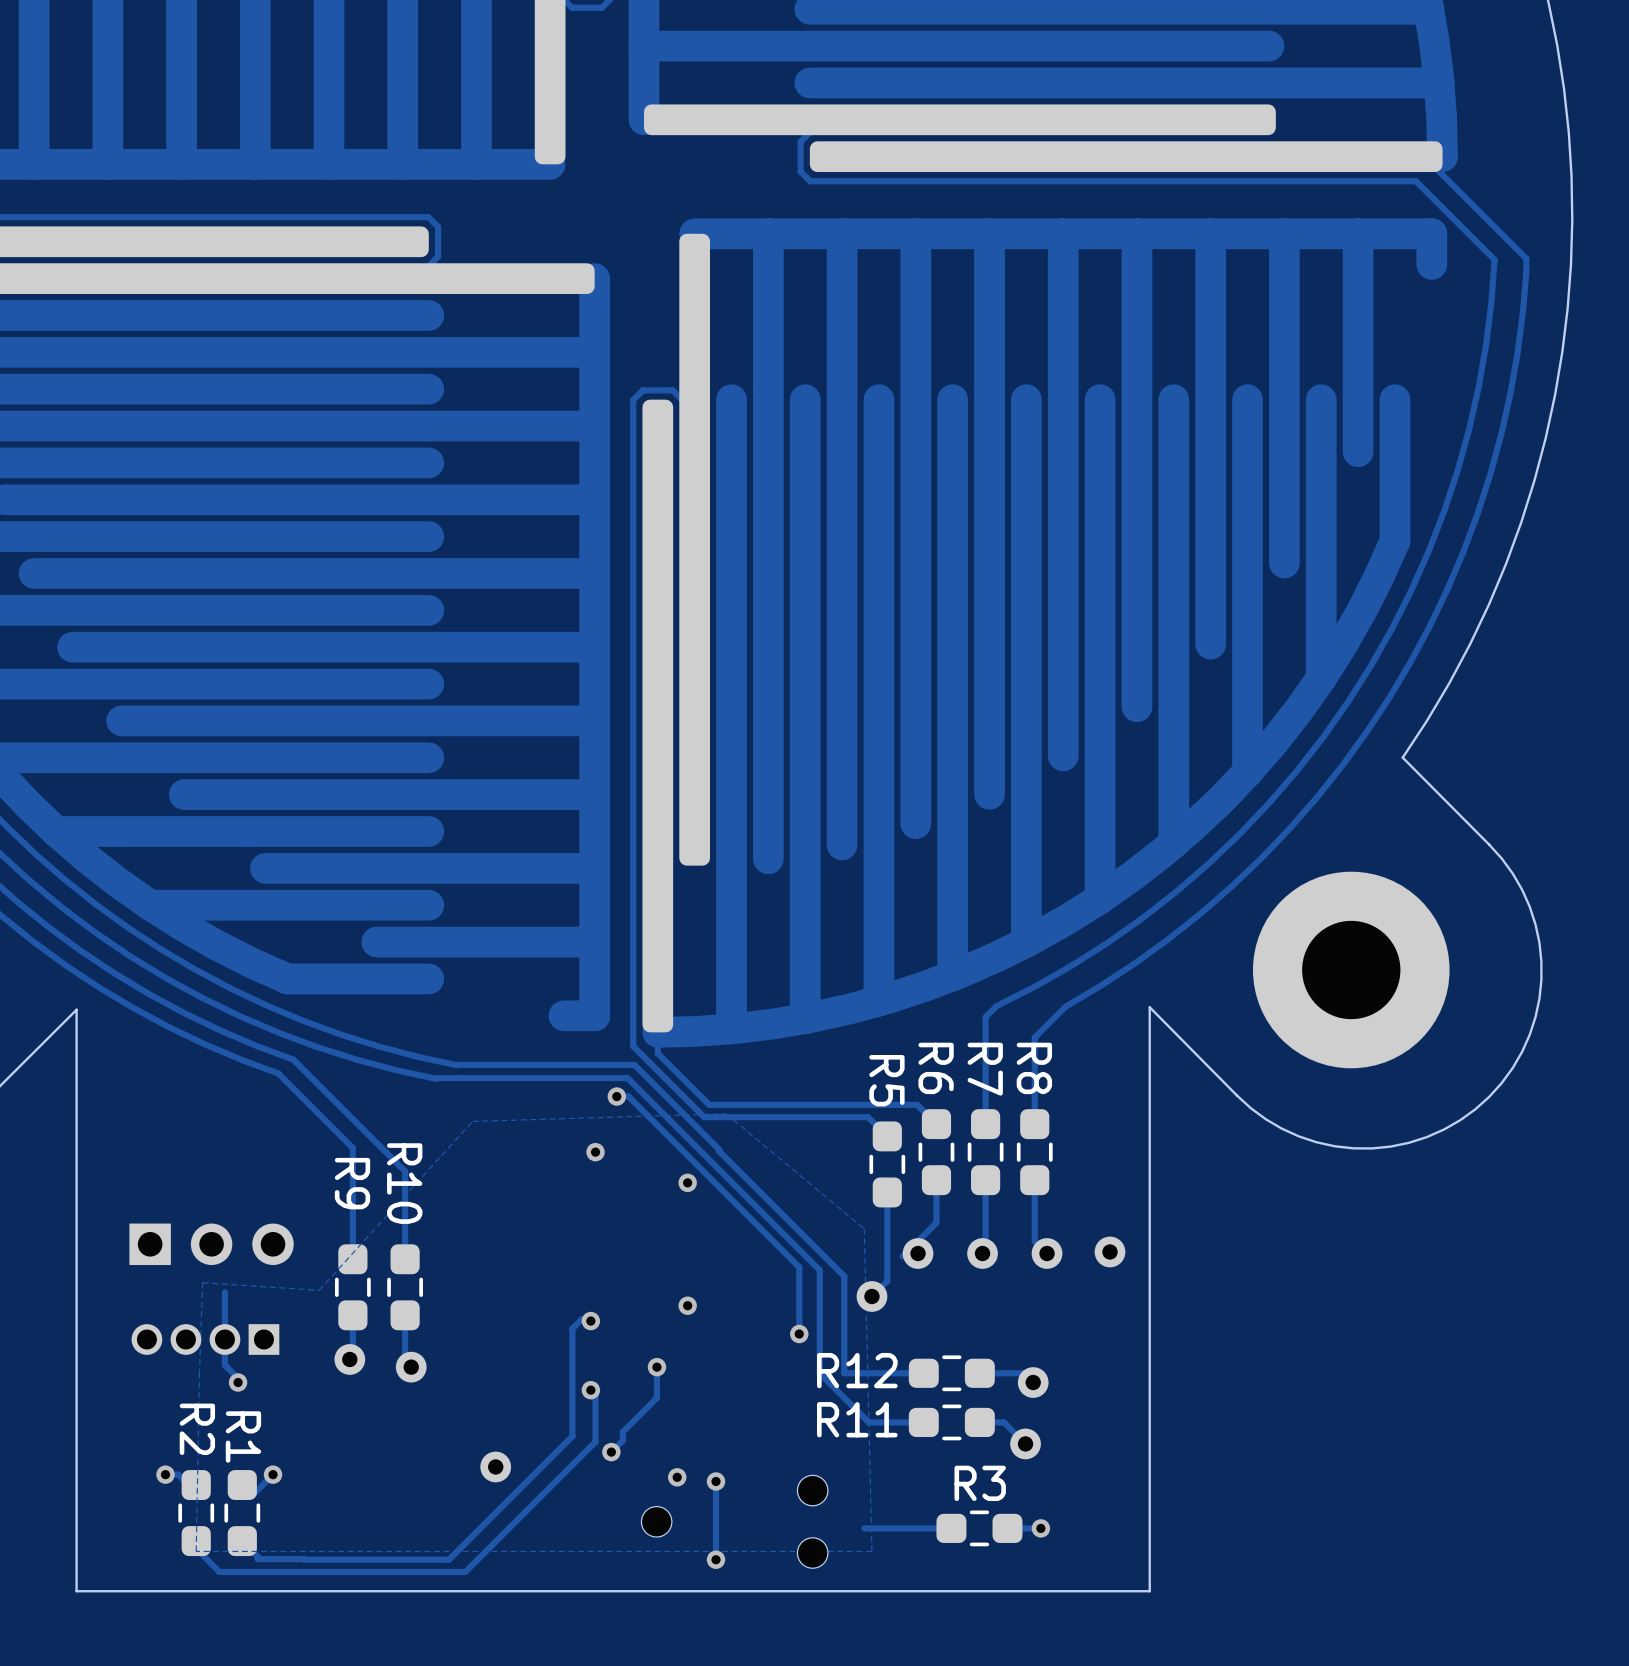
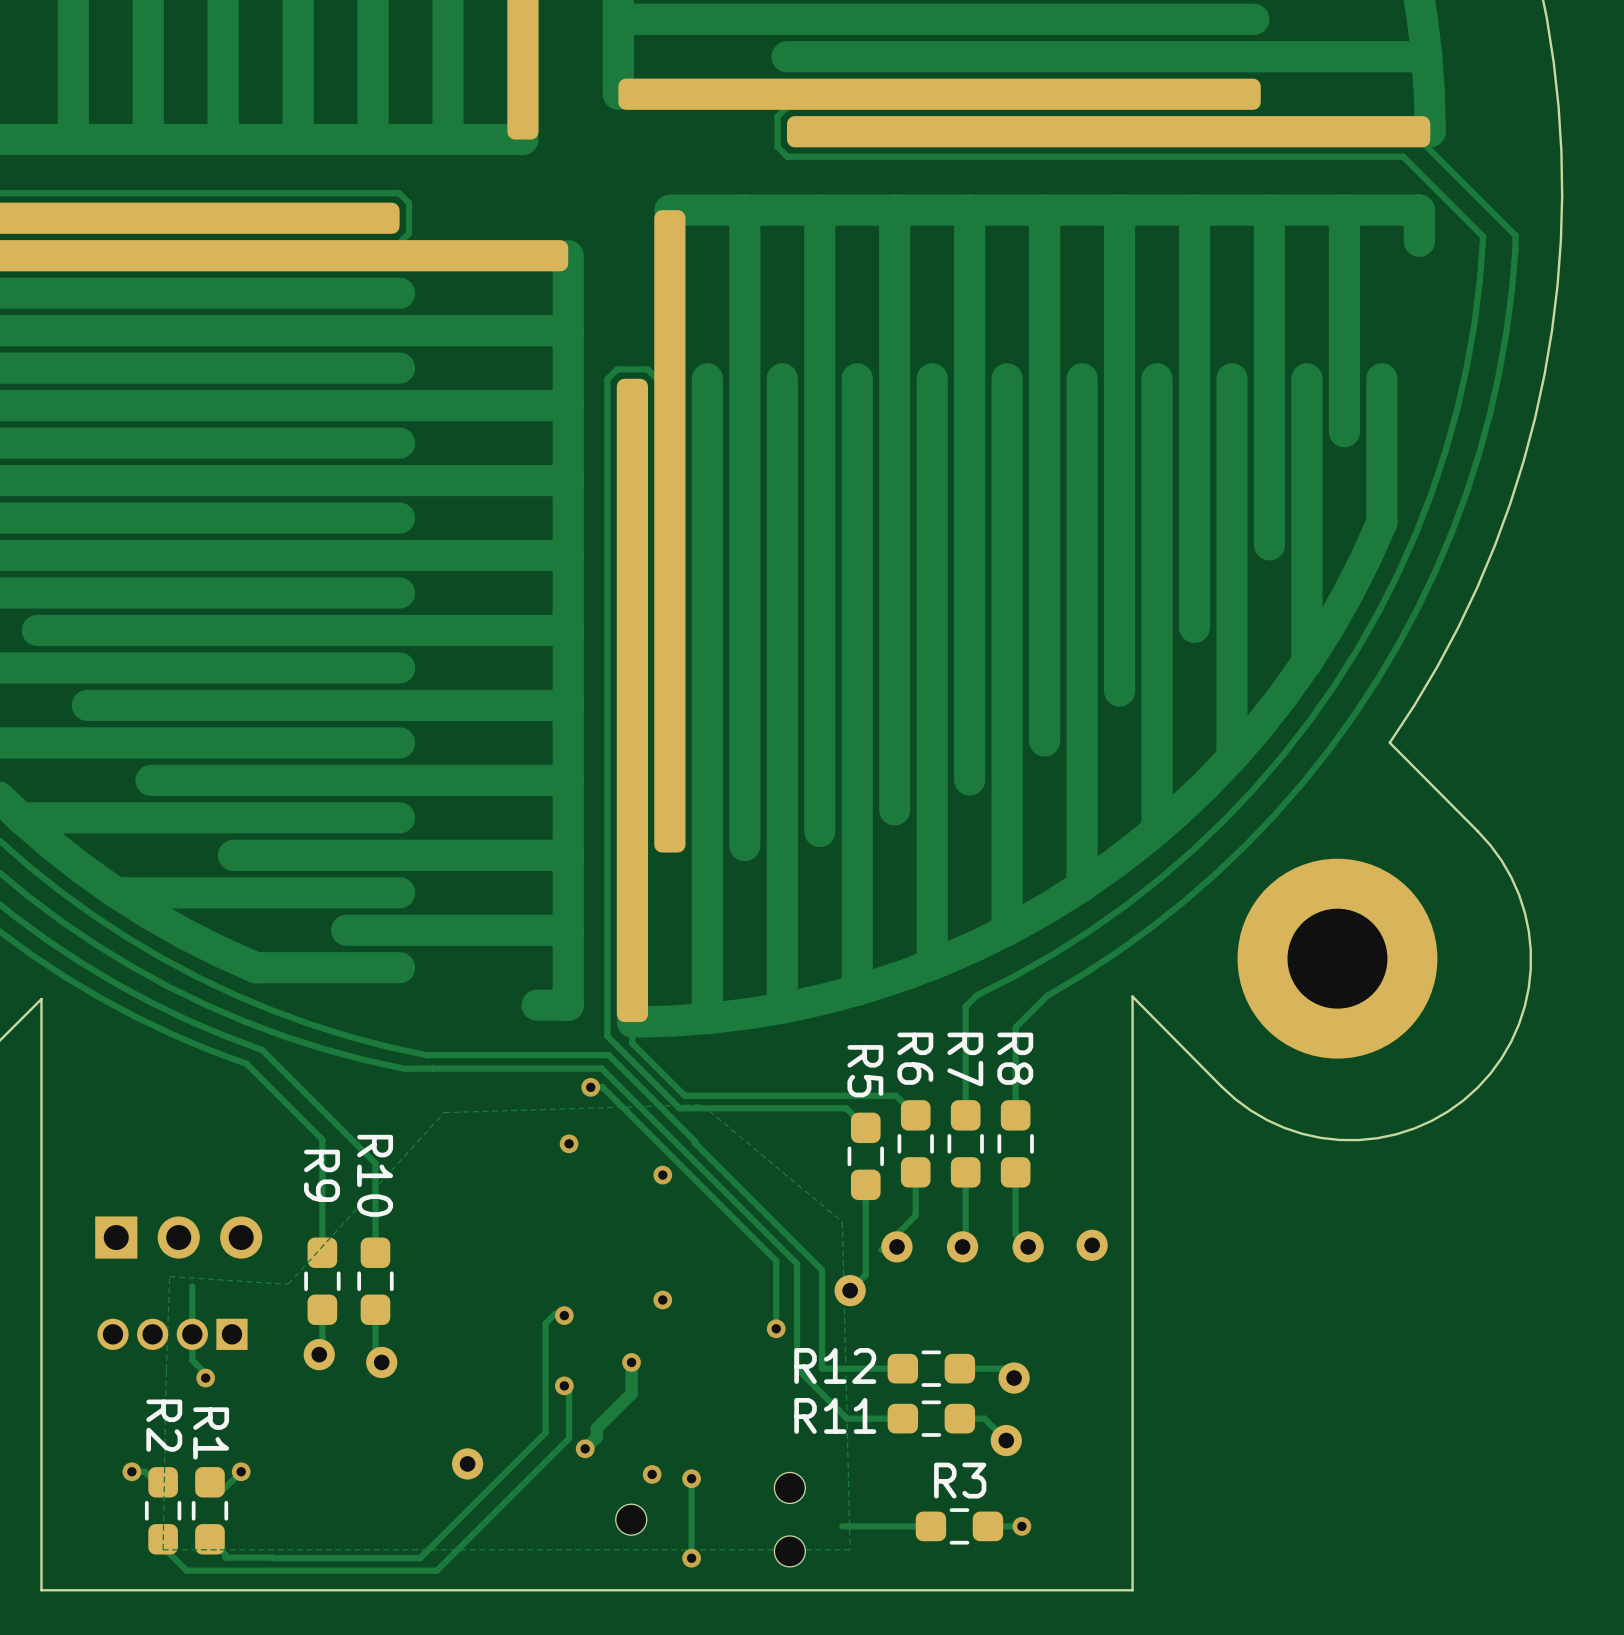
track width: thin (656, 1367) (656, 1397) (622, 1431) (622, 1440) (611, 1452) -> thick (631, 1362) (631, 1393) (596, 1428) (596, 1437) (585, 1448)

